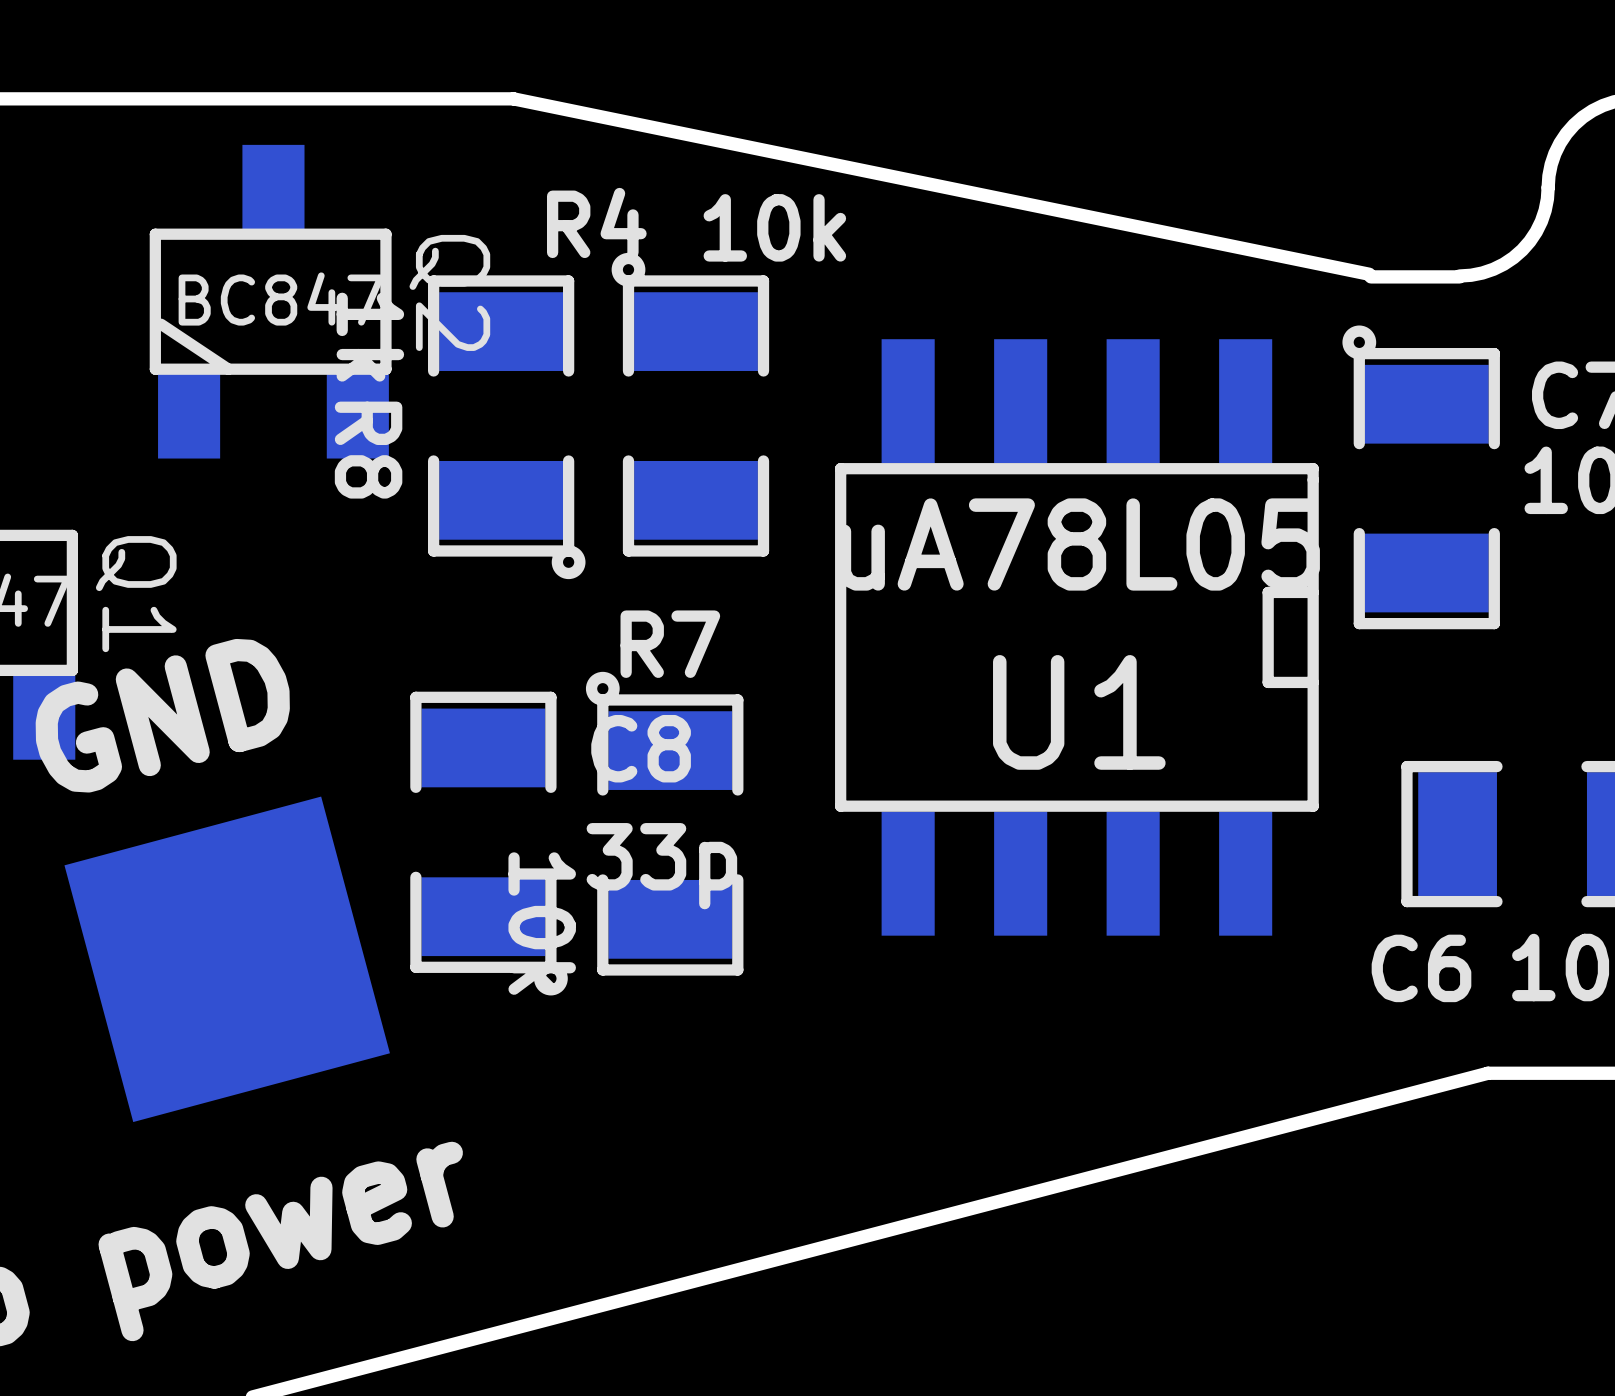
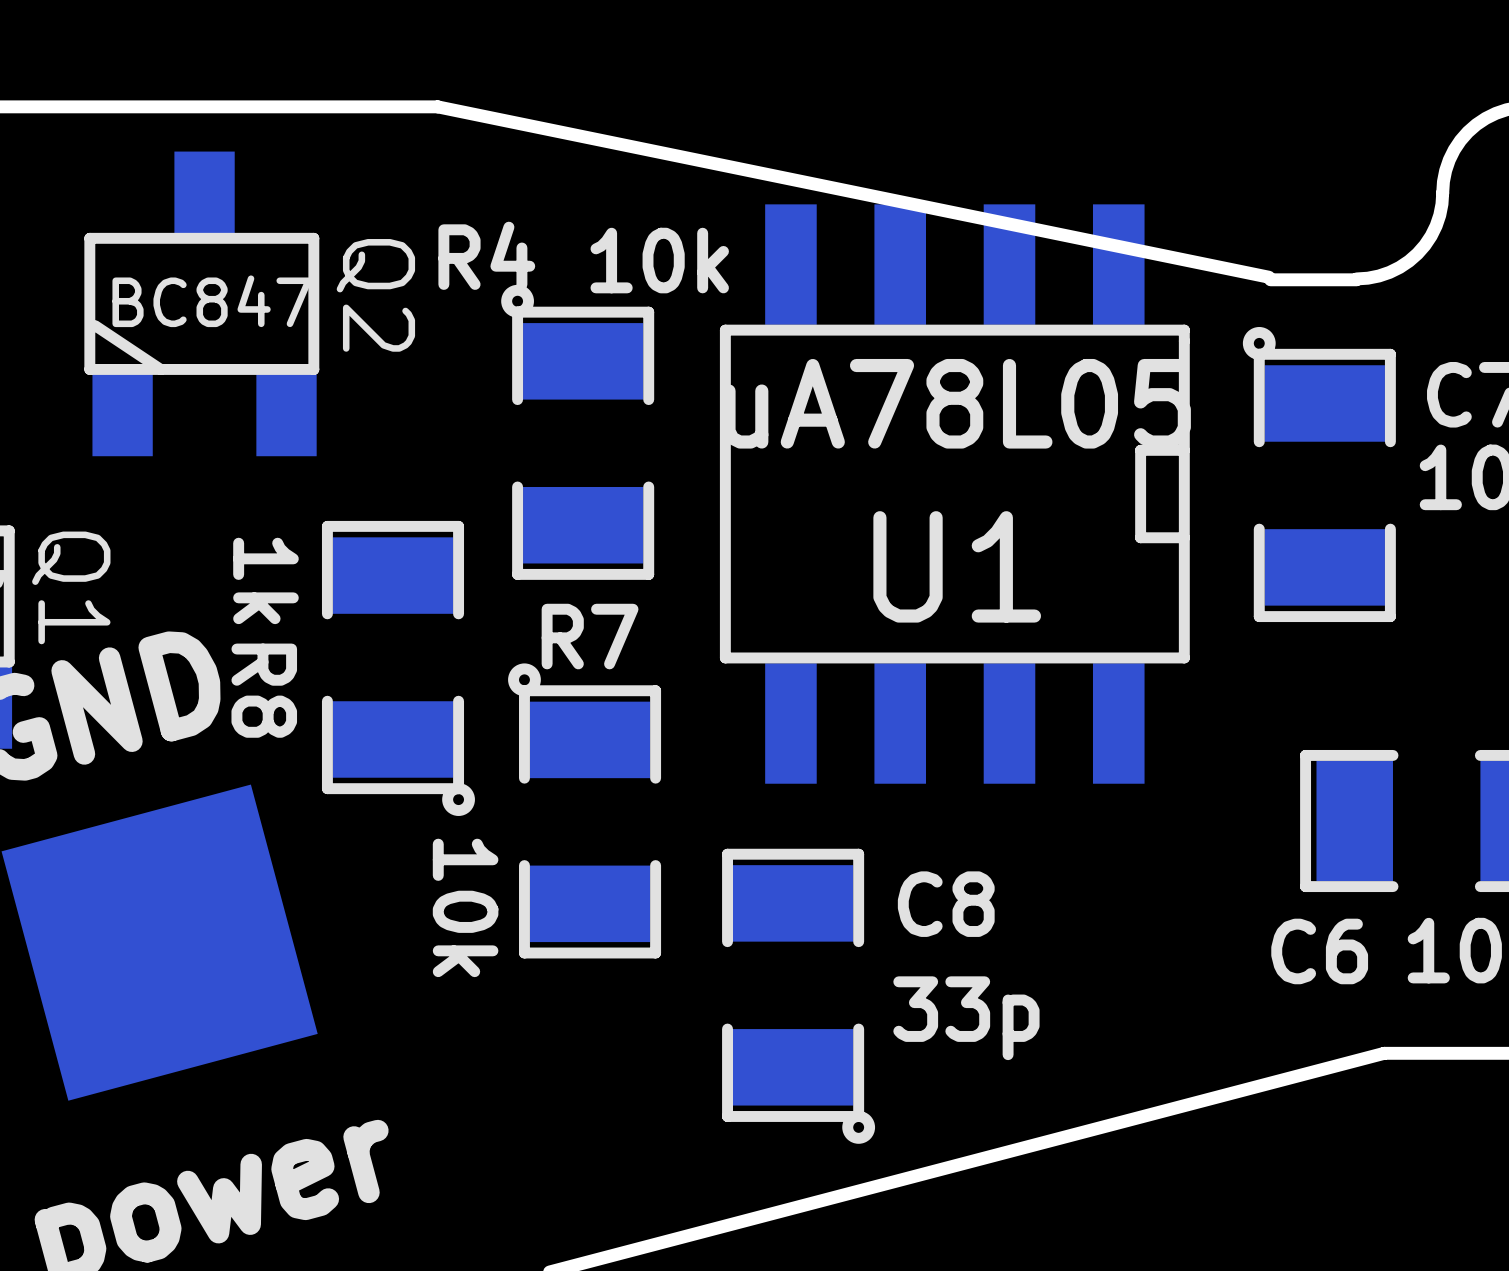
R4 position: (690, 404) -> (577, 432)
R8 position: (506, 427) -> (398, 668)
U1 position: (1076, 637) -> (954, 494)
C8 position: (489, 843) -> (798, 996)

